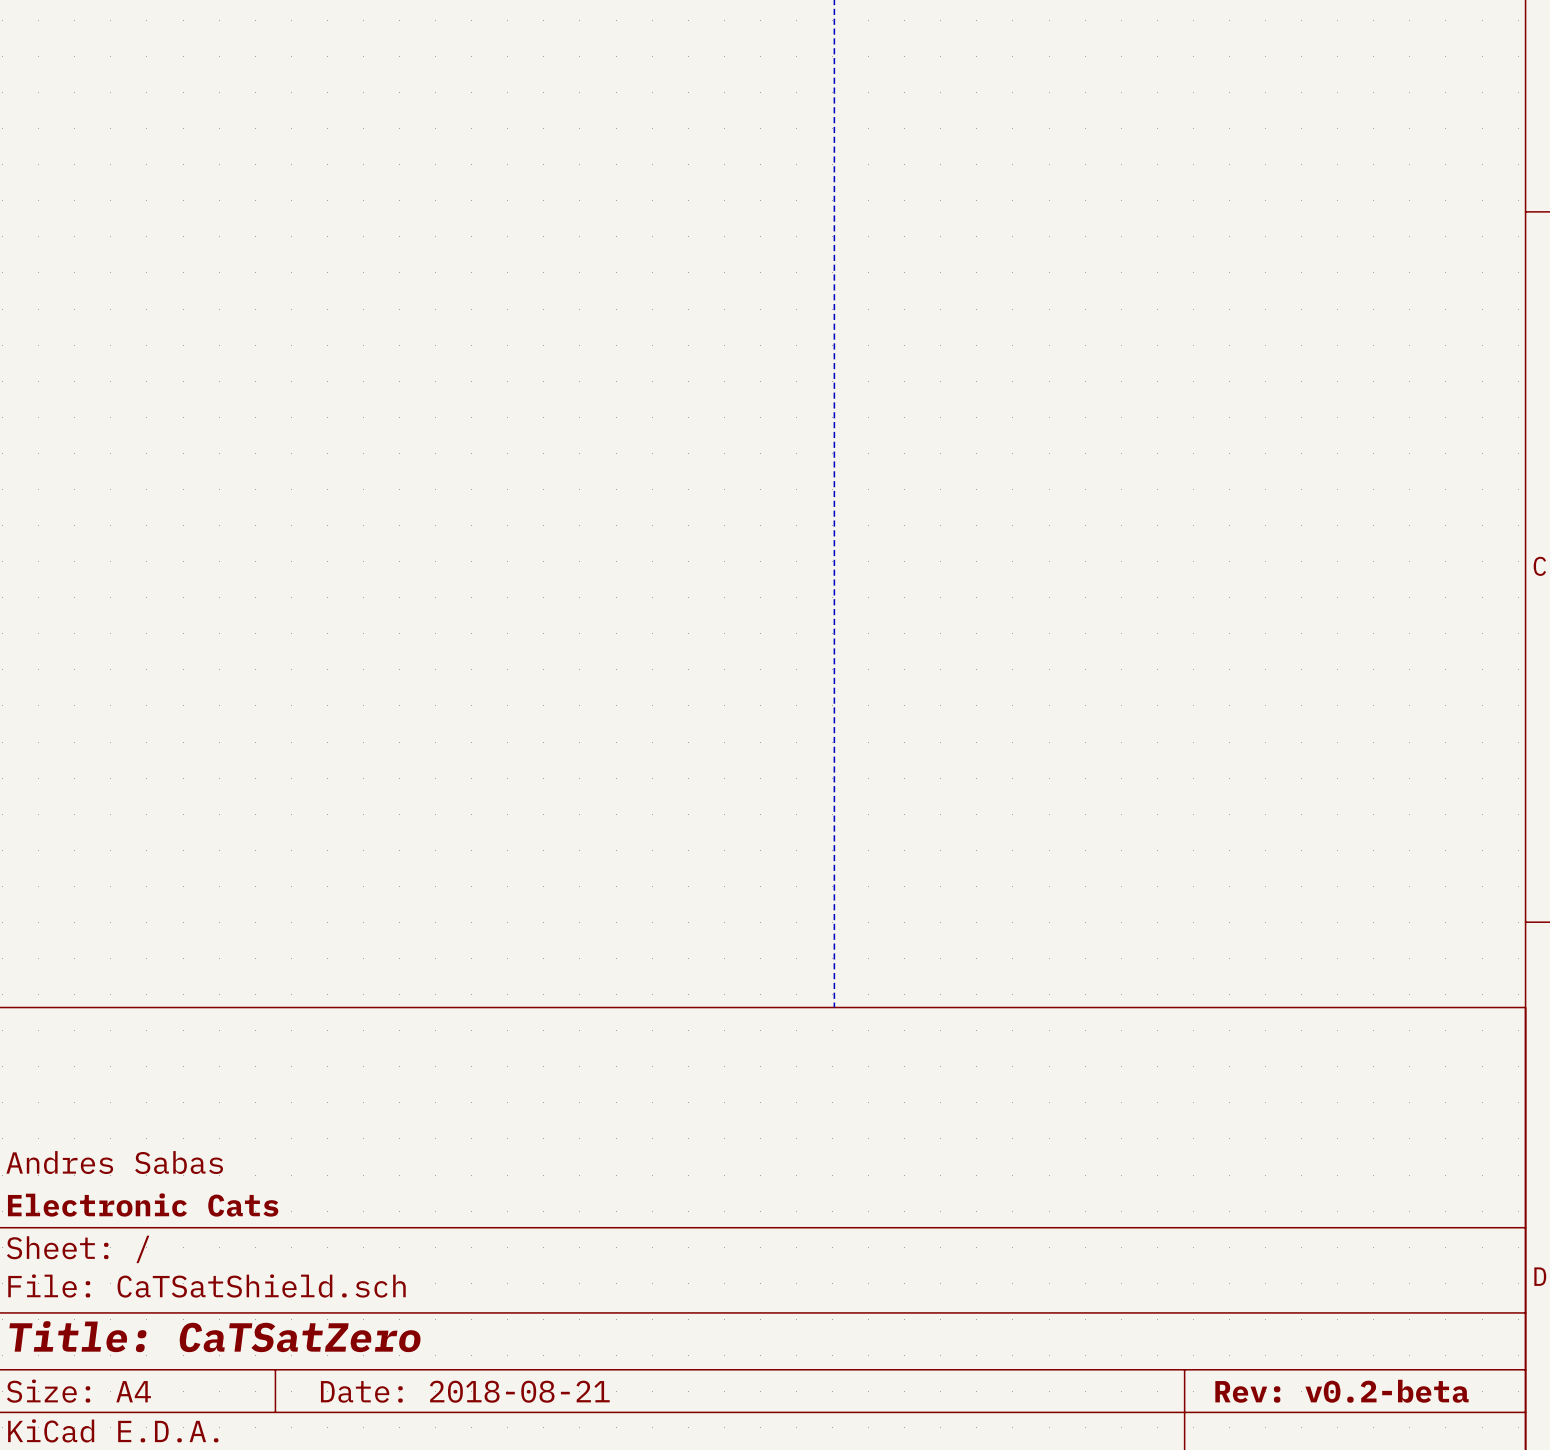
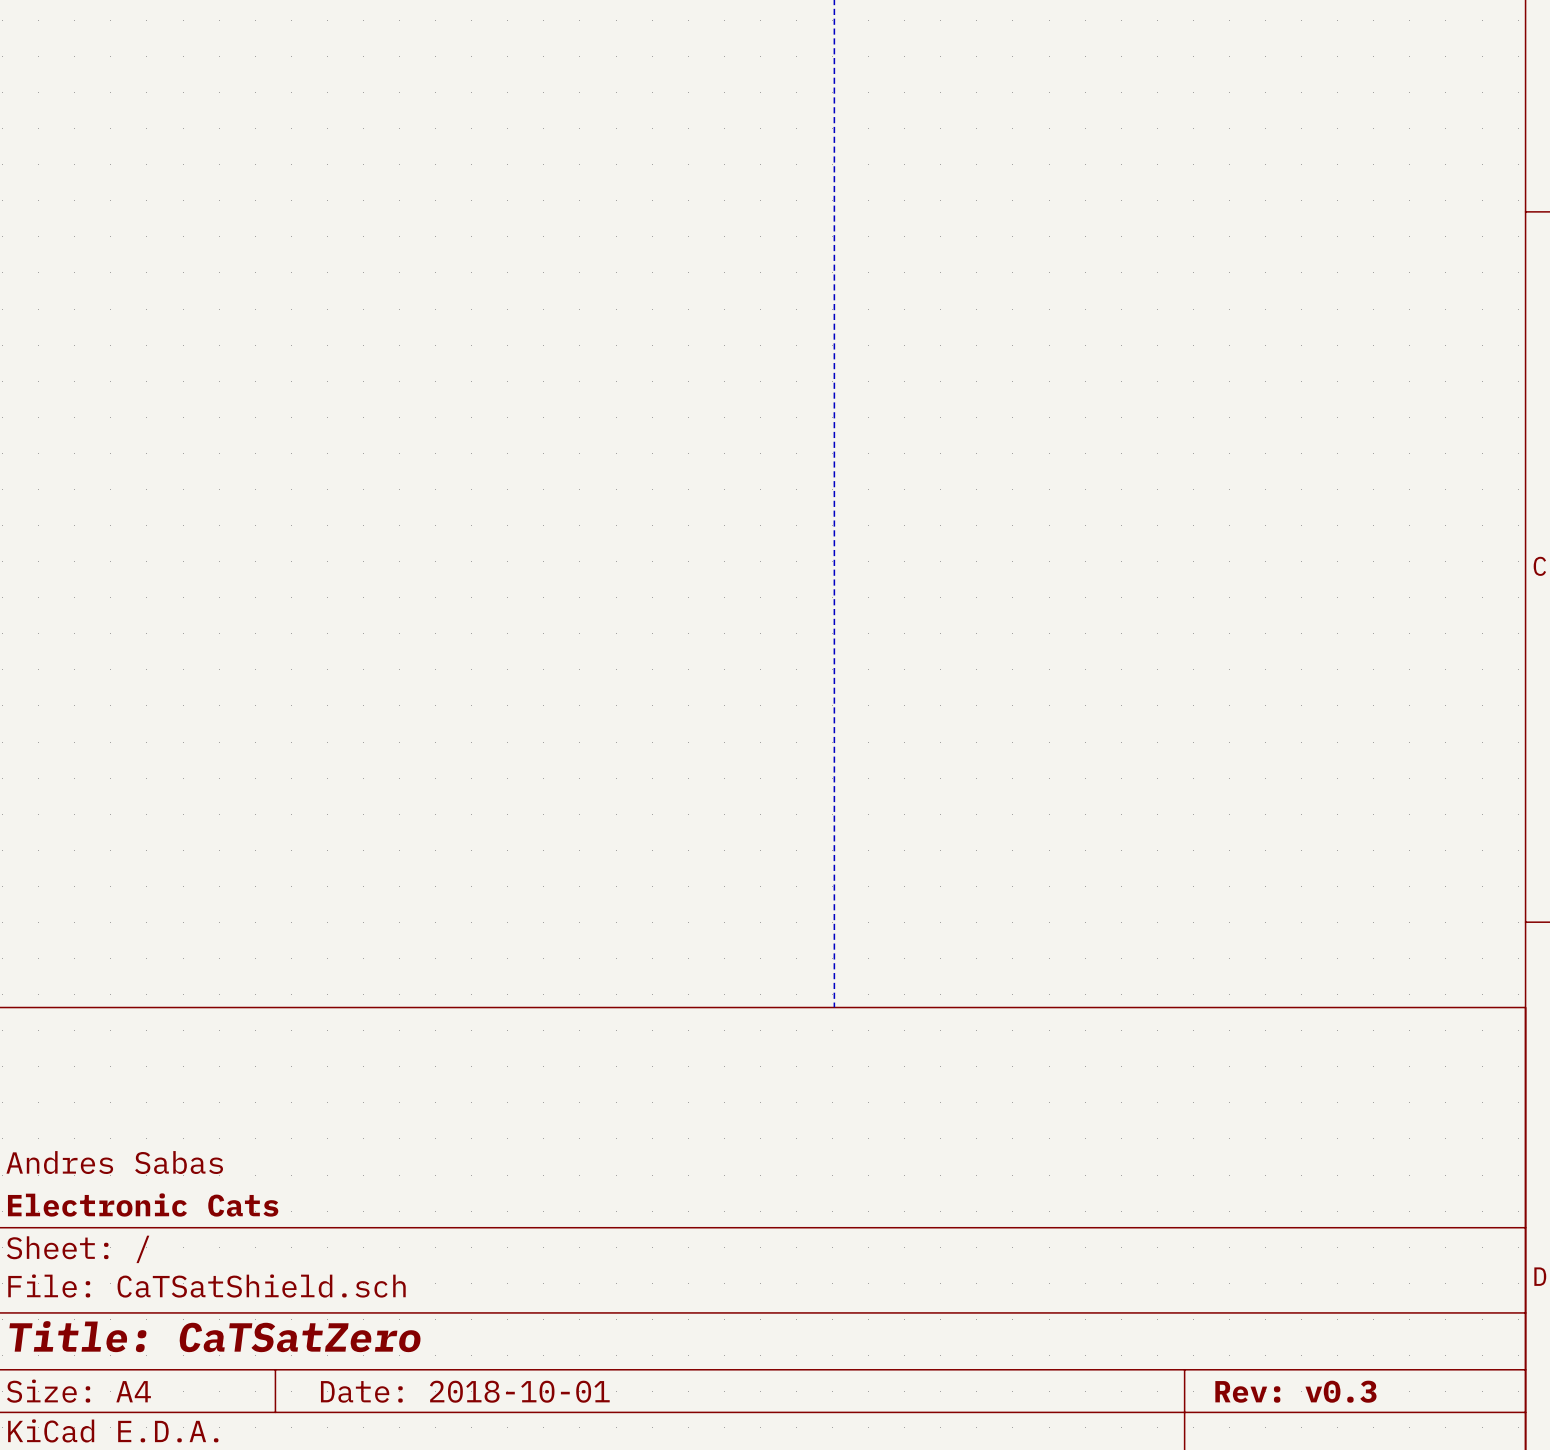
title block: Date: 2018-08-21 (465, 1391) -> Date: 2018-10-01 (465, 1391)
title block: Rev: v0.2-beta (1341, 1391) -> Rev: v0.3 (1295, 1391)

